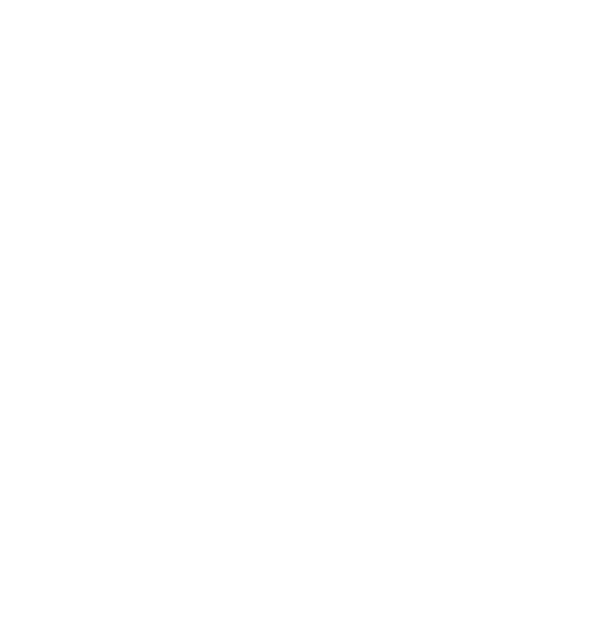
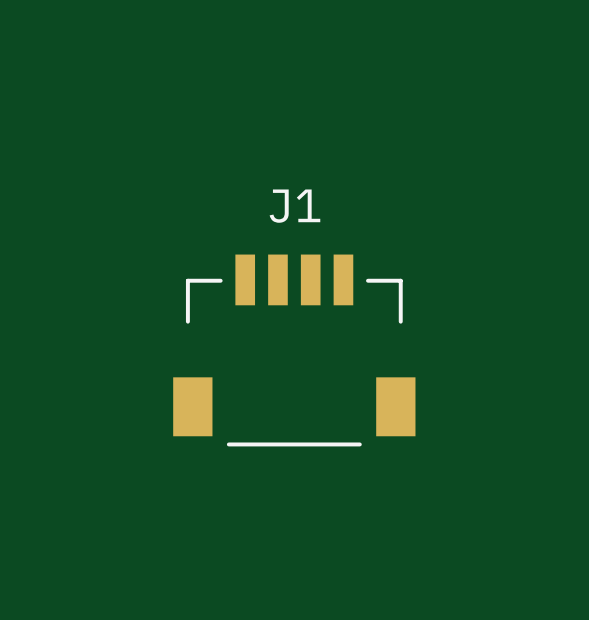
J1: none -> (294, 350)

